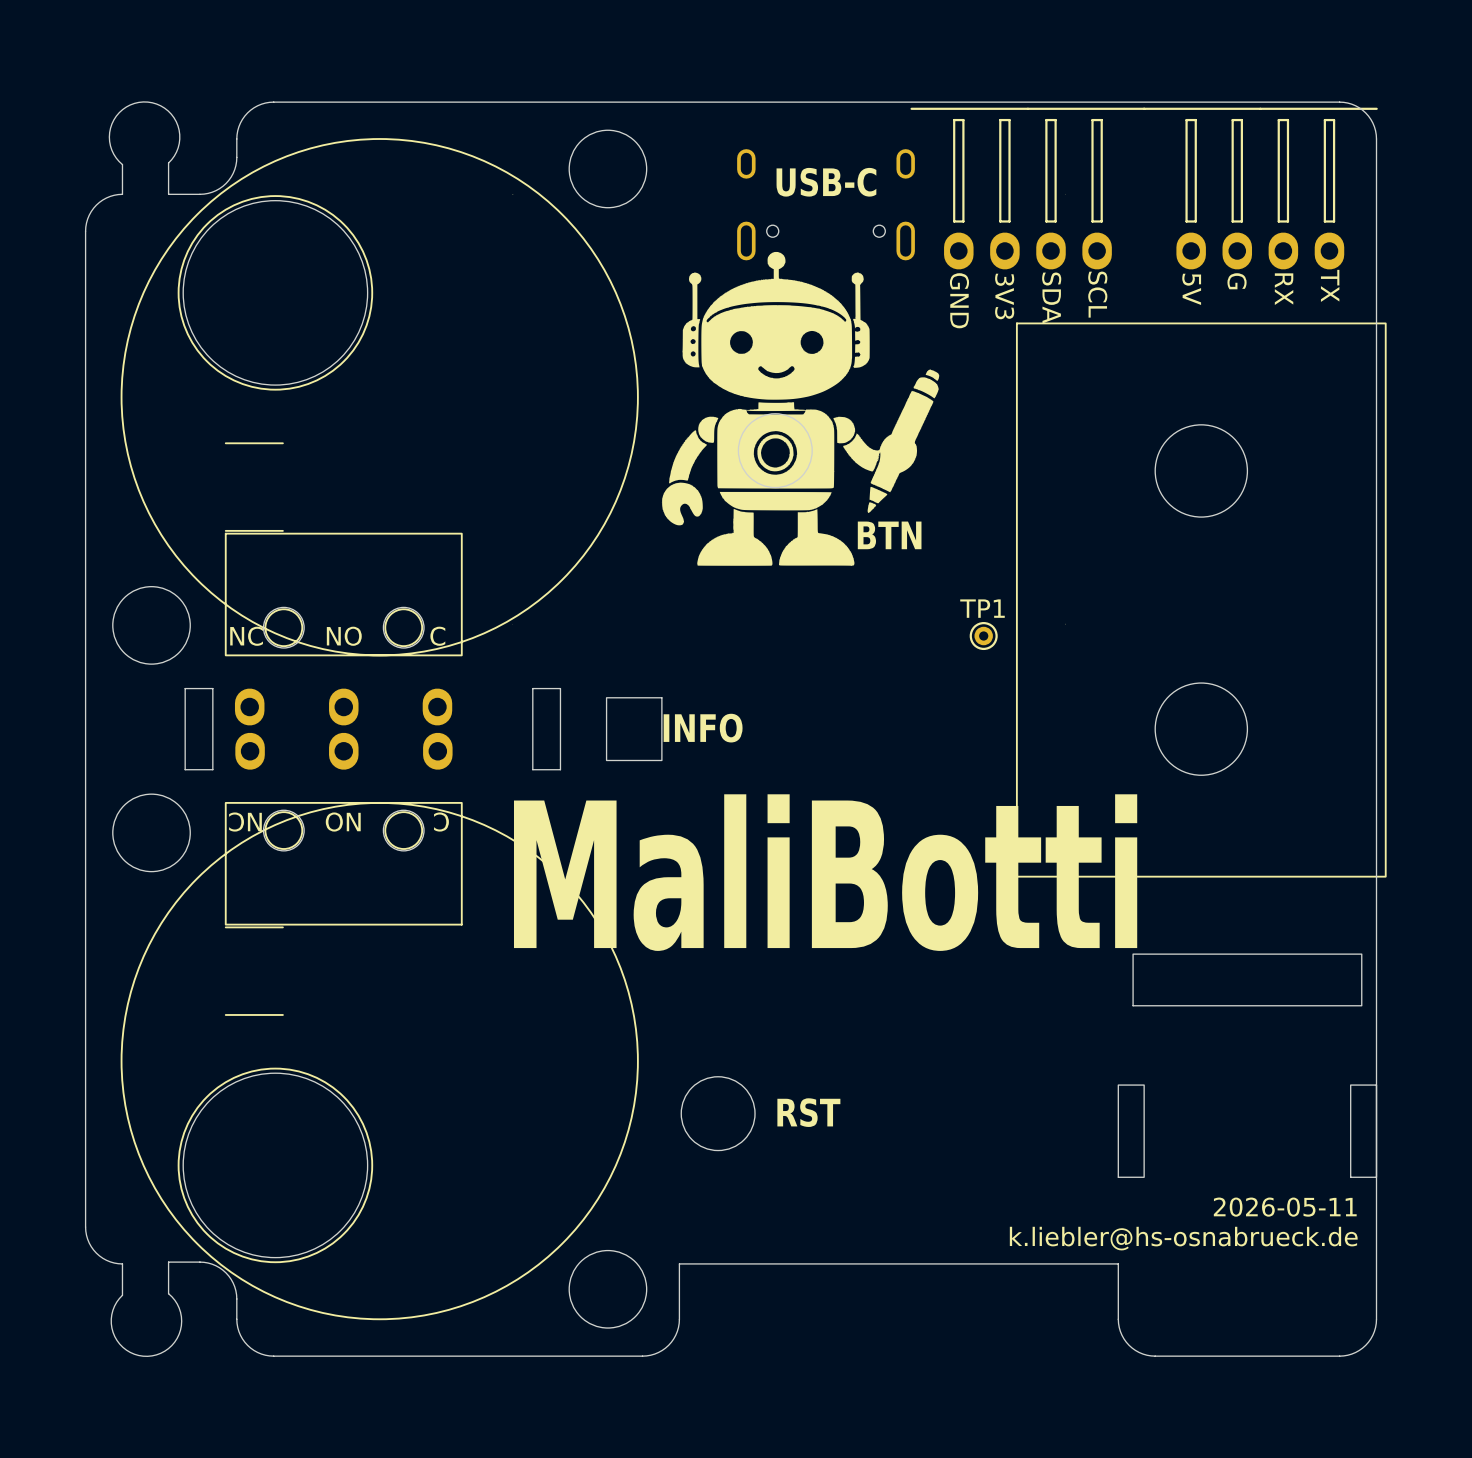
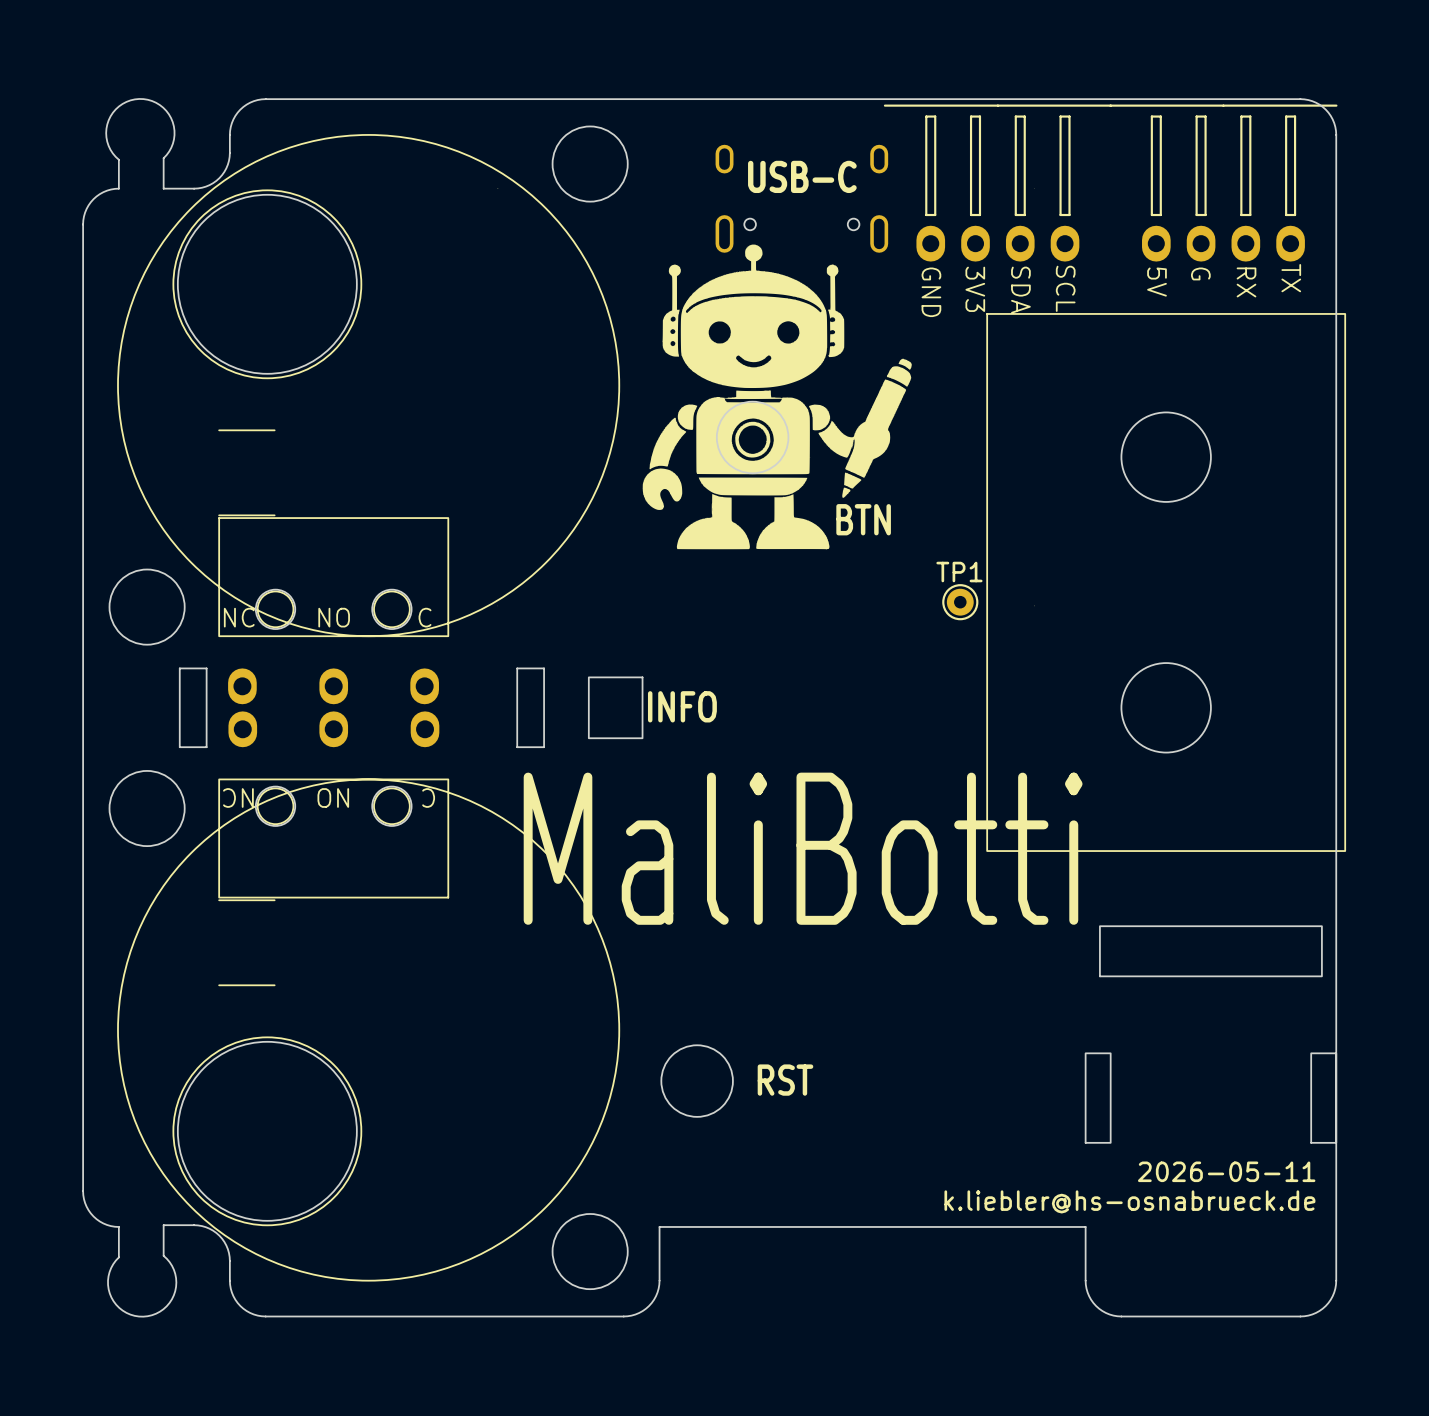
TP1 footprint: [969, 621, 998, 651] -> [942, 584, 979, 621]

